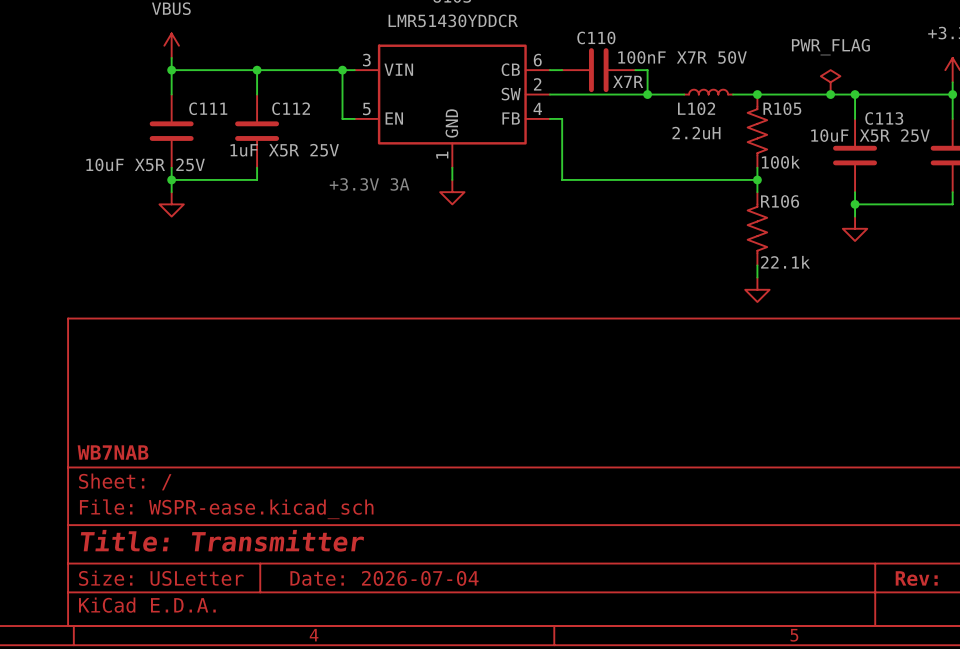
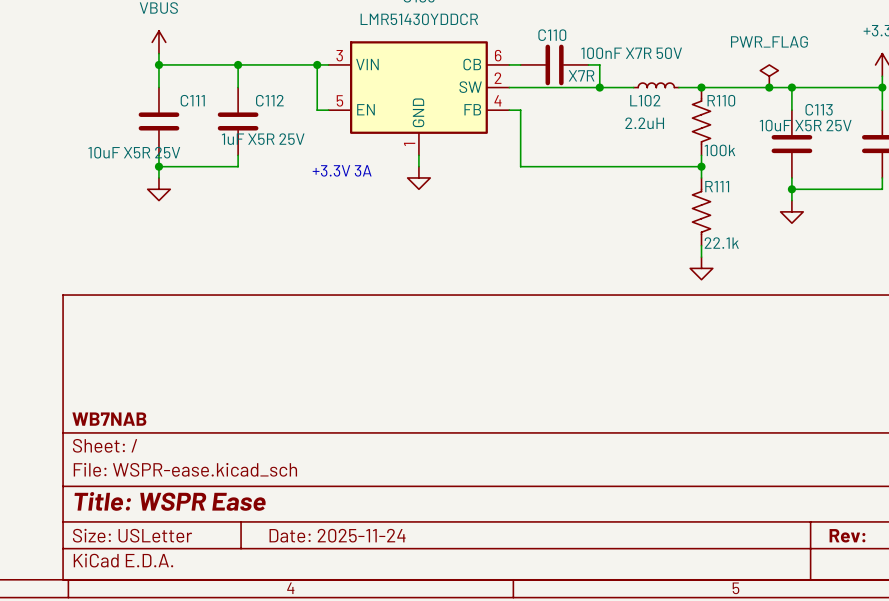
R105 name: R105 (782, 108) -> R110 (721, 100)
R106 name: R106 (780, 201) -> R111 (717, 186)
title block: Title: Transmitter (222, 540) -> Title: WSPR Ease (170, 501)
title block: Date: 2026-07-04 (384, 578) -> Date: 2025-11-24 (337, 535)

